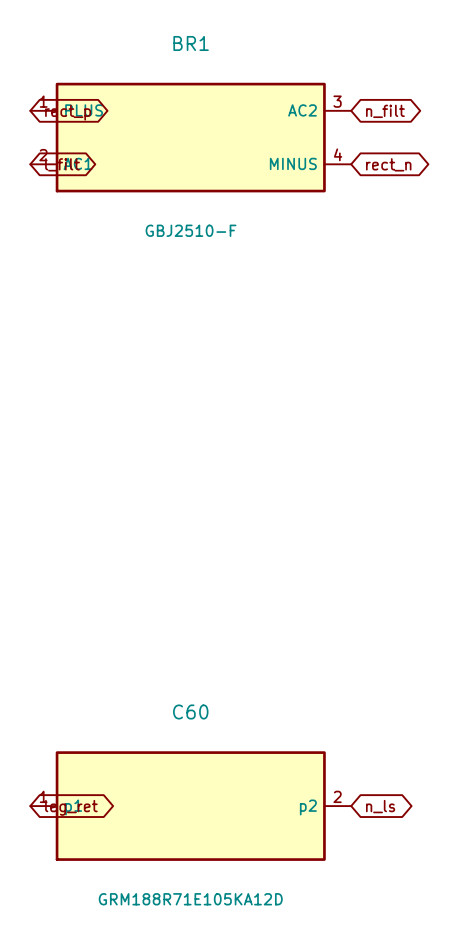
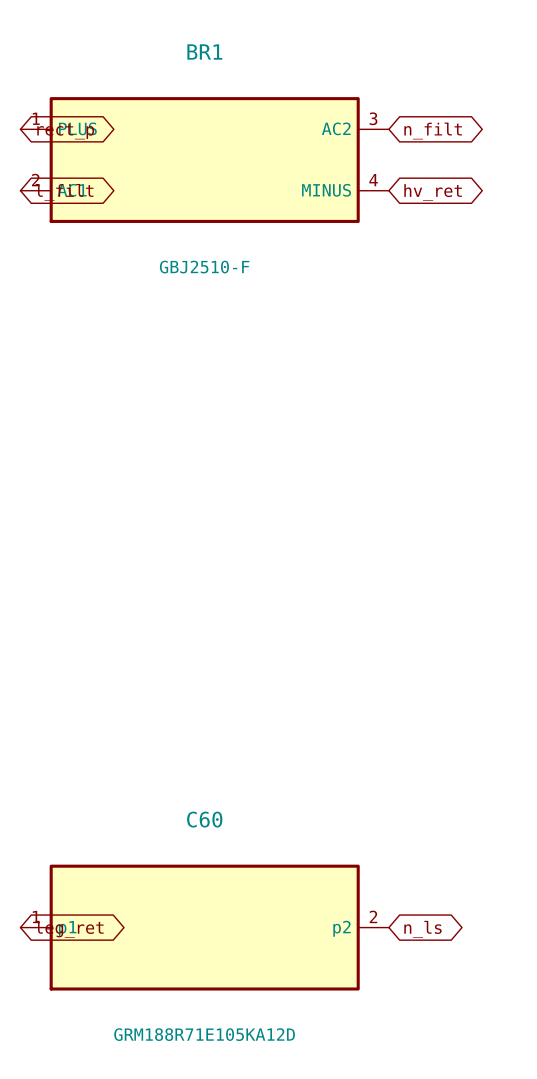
global label: rect_n (388, 164) -> hv_ret (433, 192)

